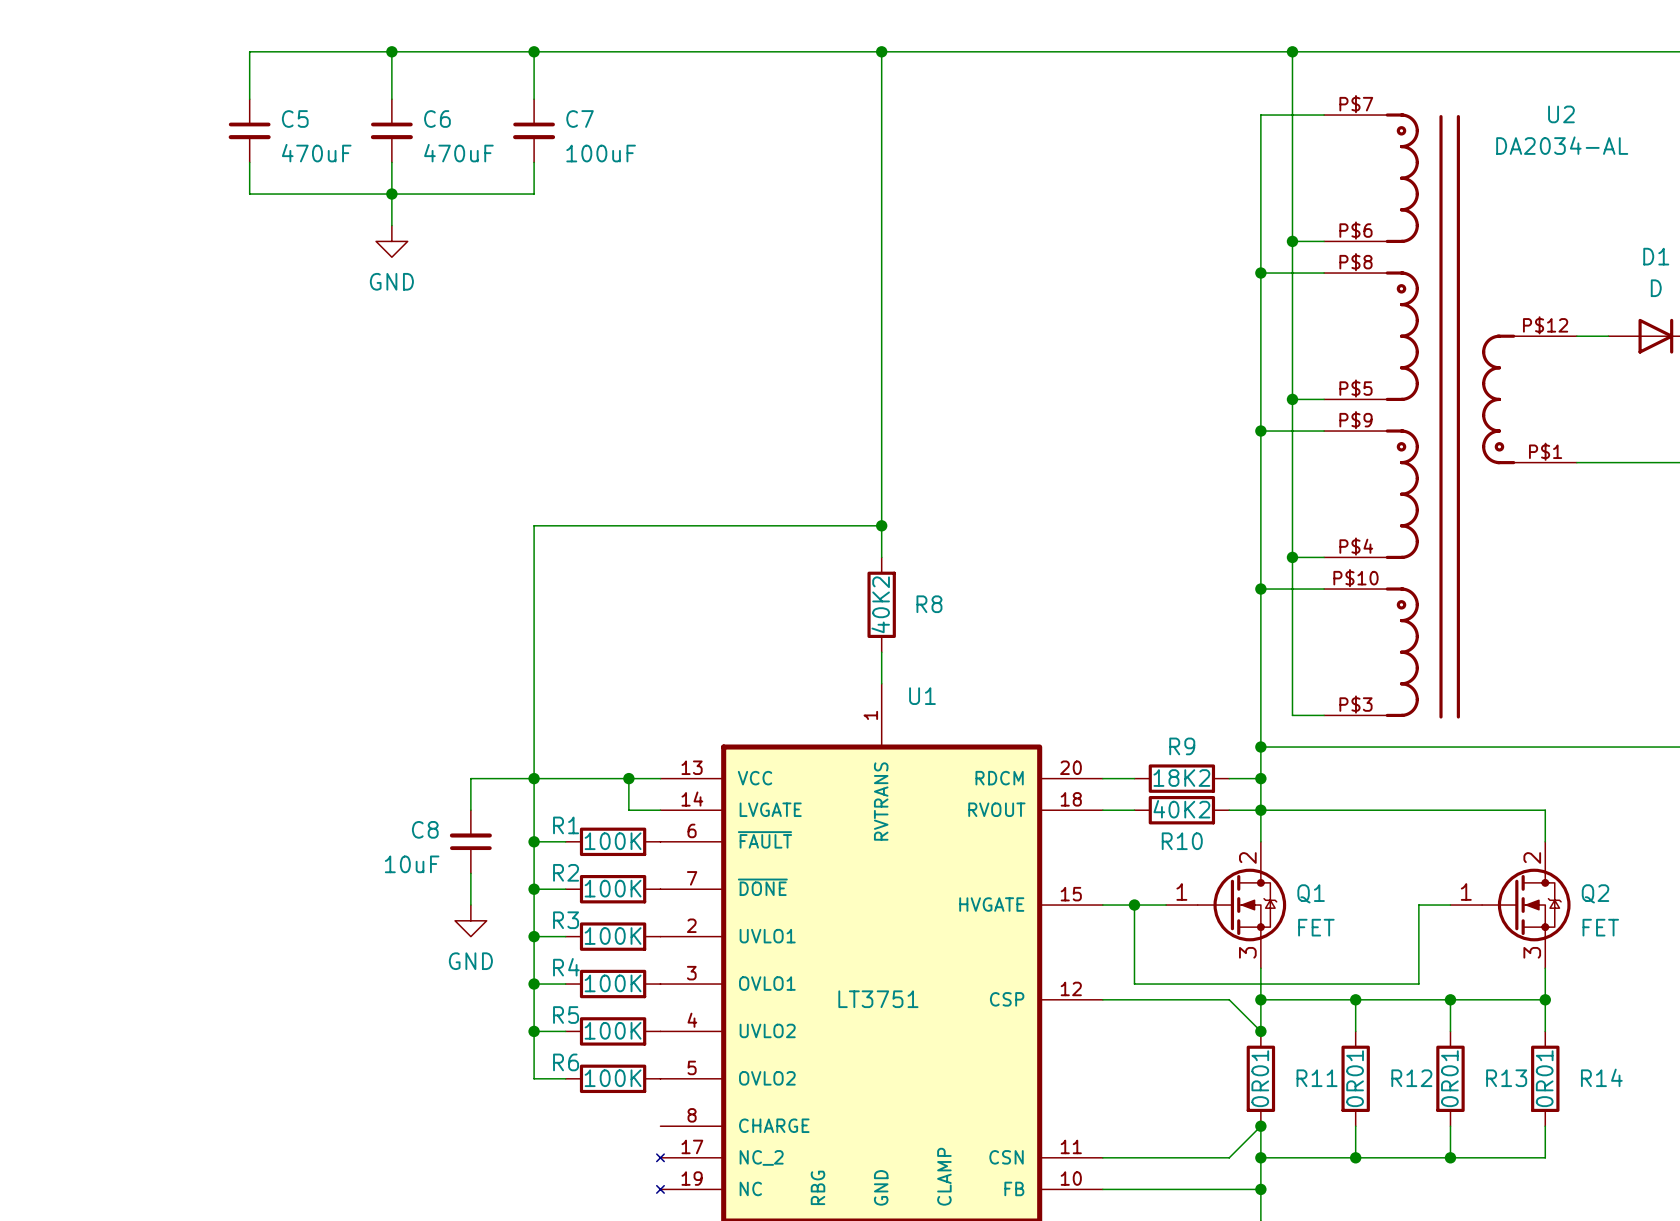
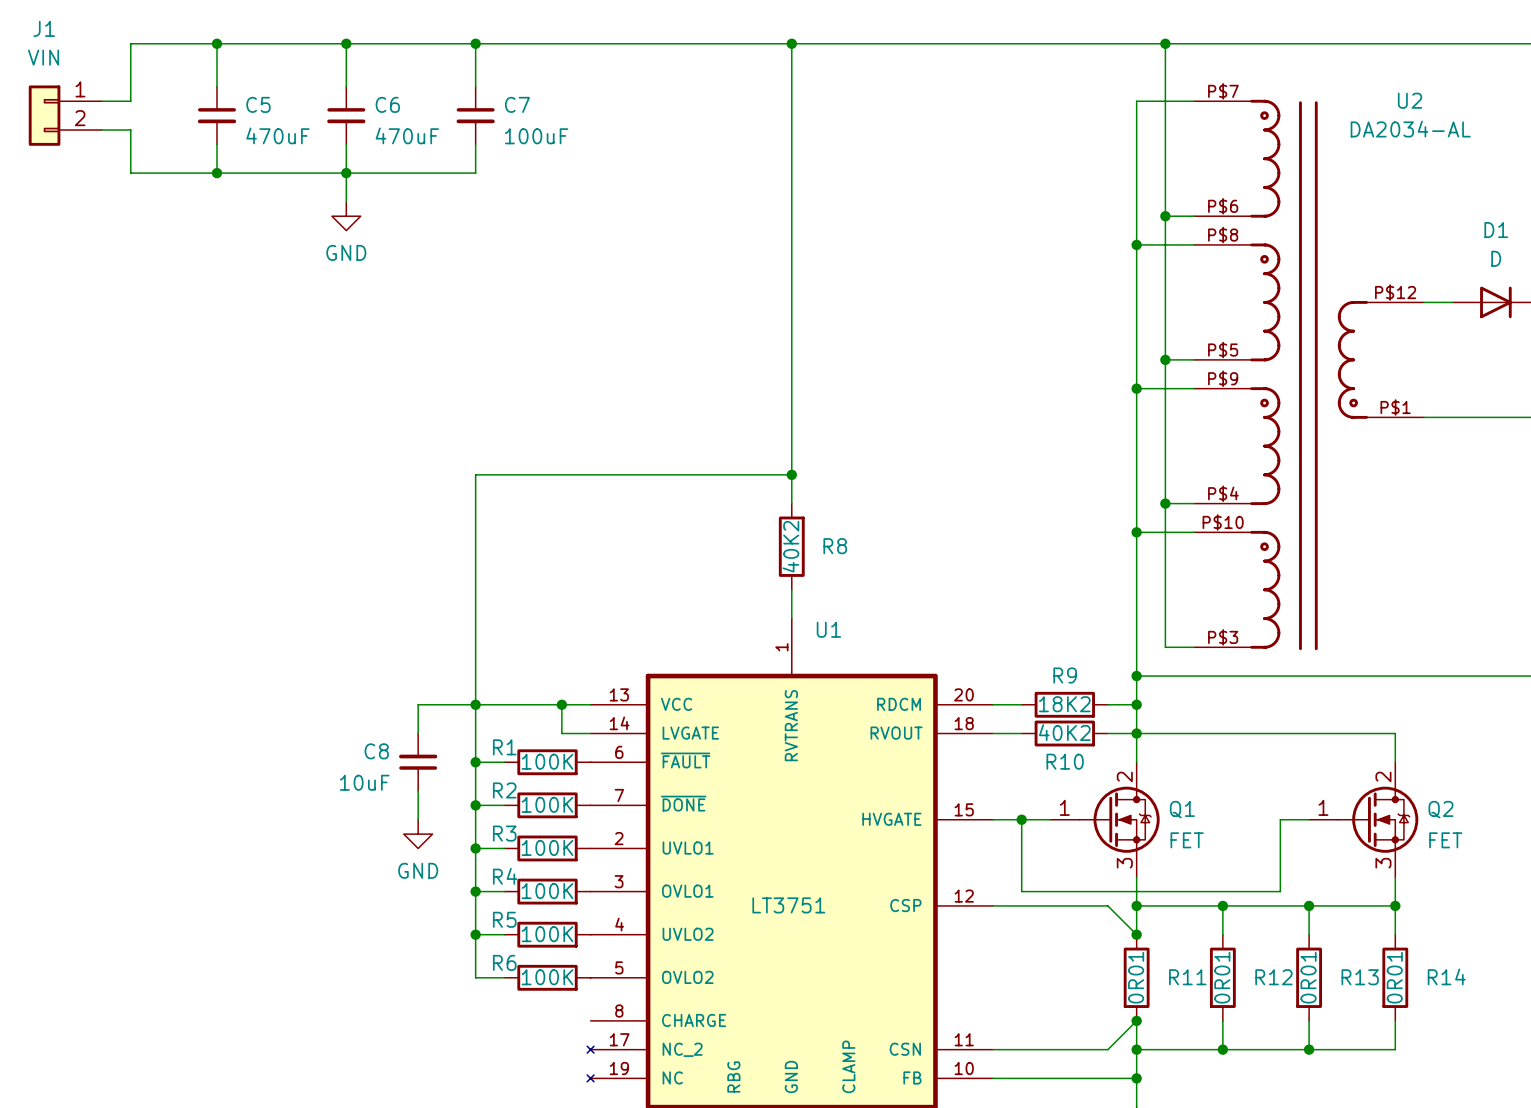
wire: none -> (216, 43) (130, 43) (130, 101) (102, 101)
junction: none -> (216, 43)
J1: none -> VIN (65, 115)
wire: none -> (102, 129) (130, 129) (130, 173) (216, 173)
junction: none -> (216, 173)

